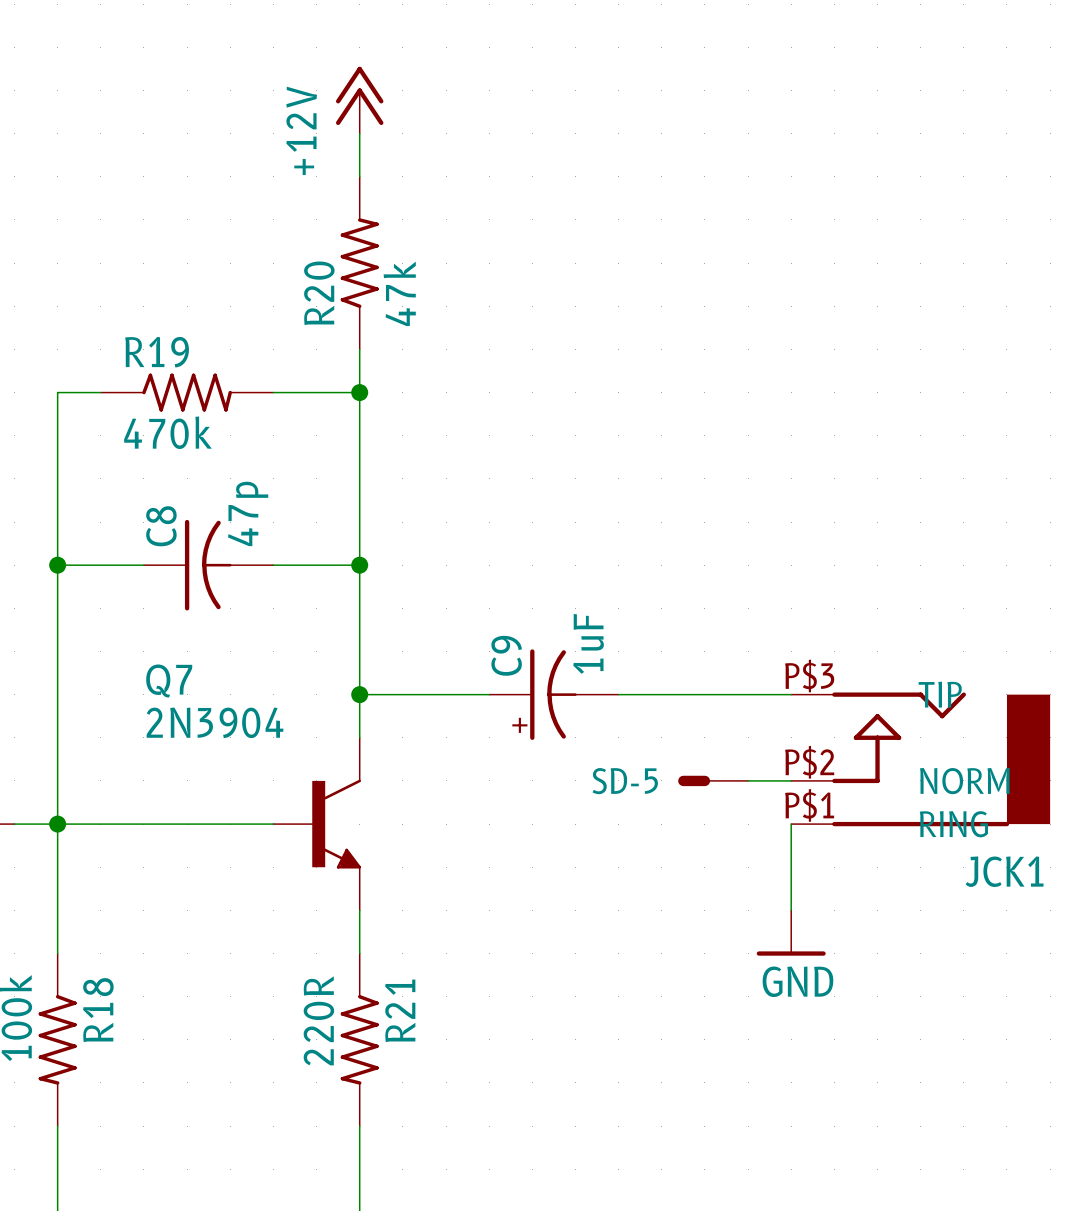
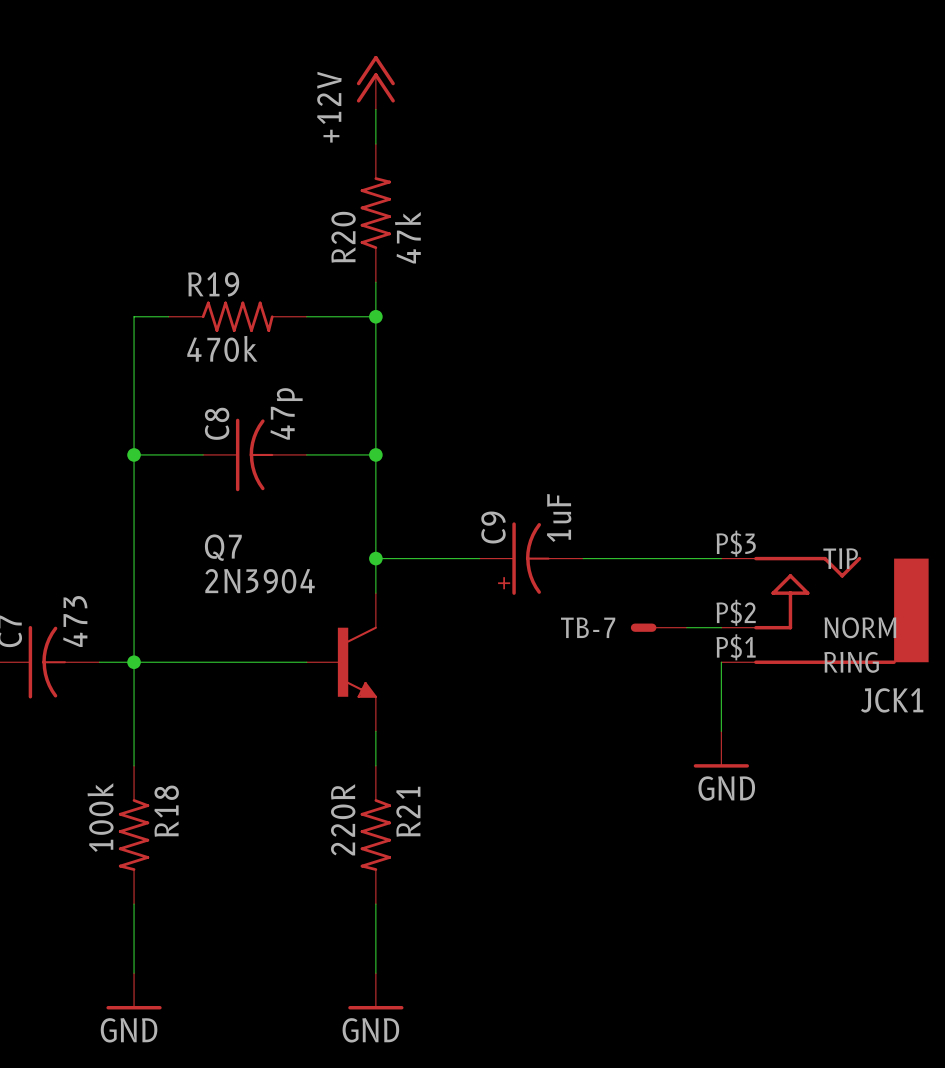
SD-5 name: SD-5 (625, 781) -> TB-7 (588, 627)

